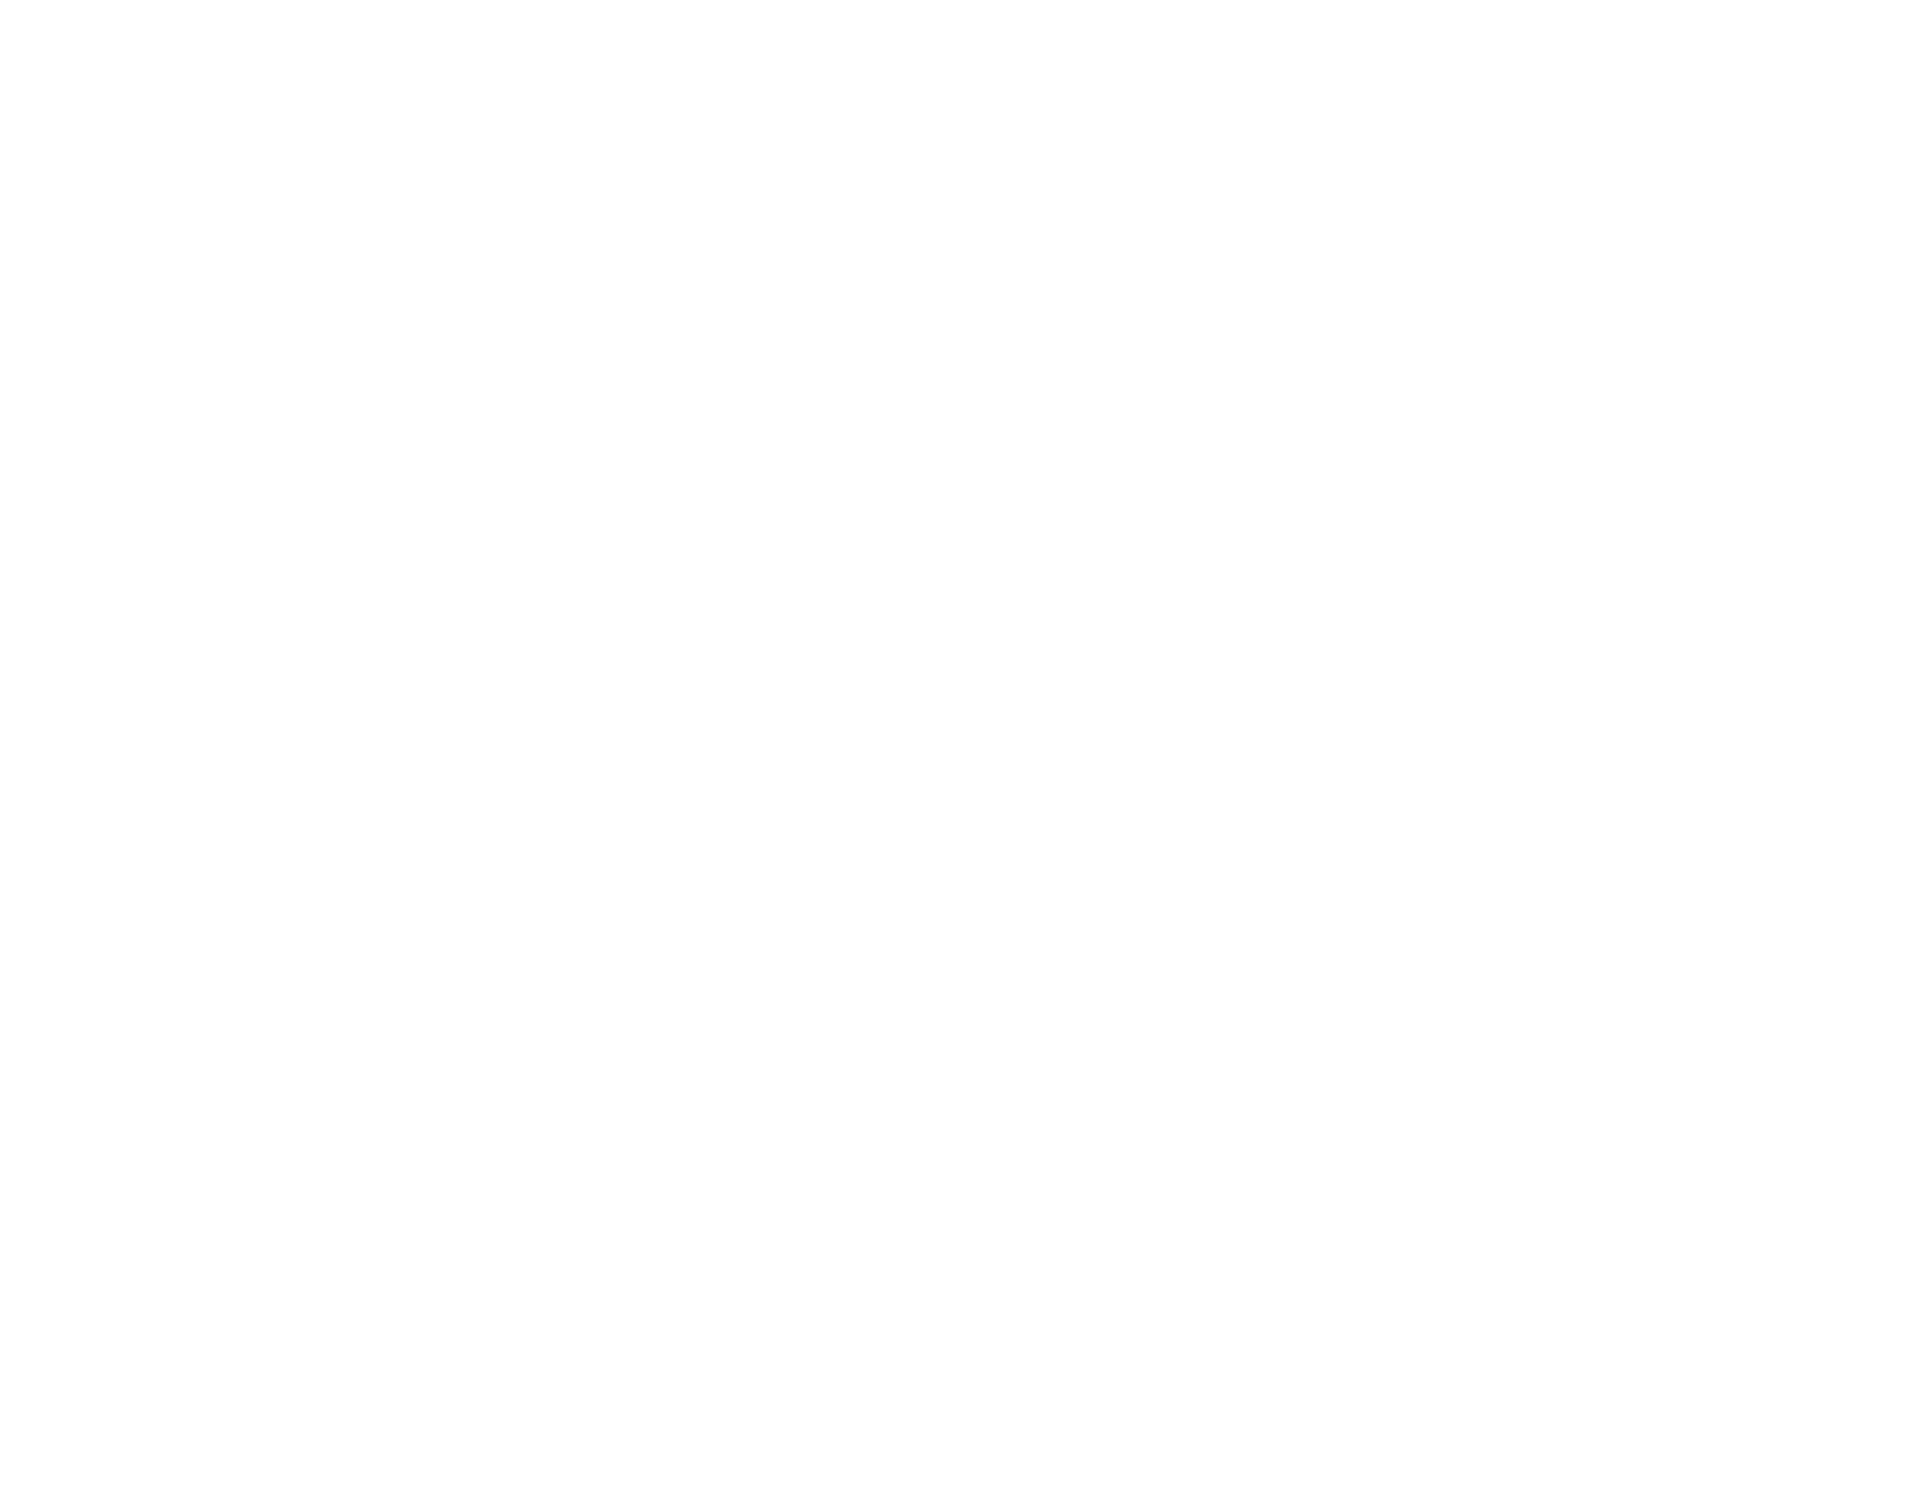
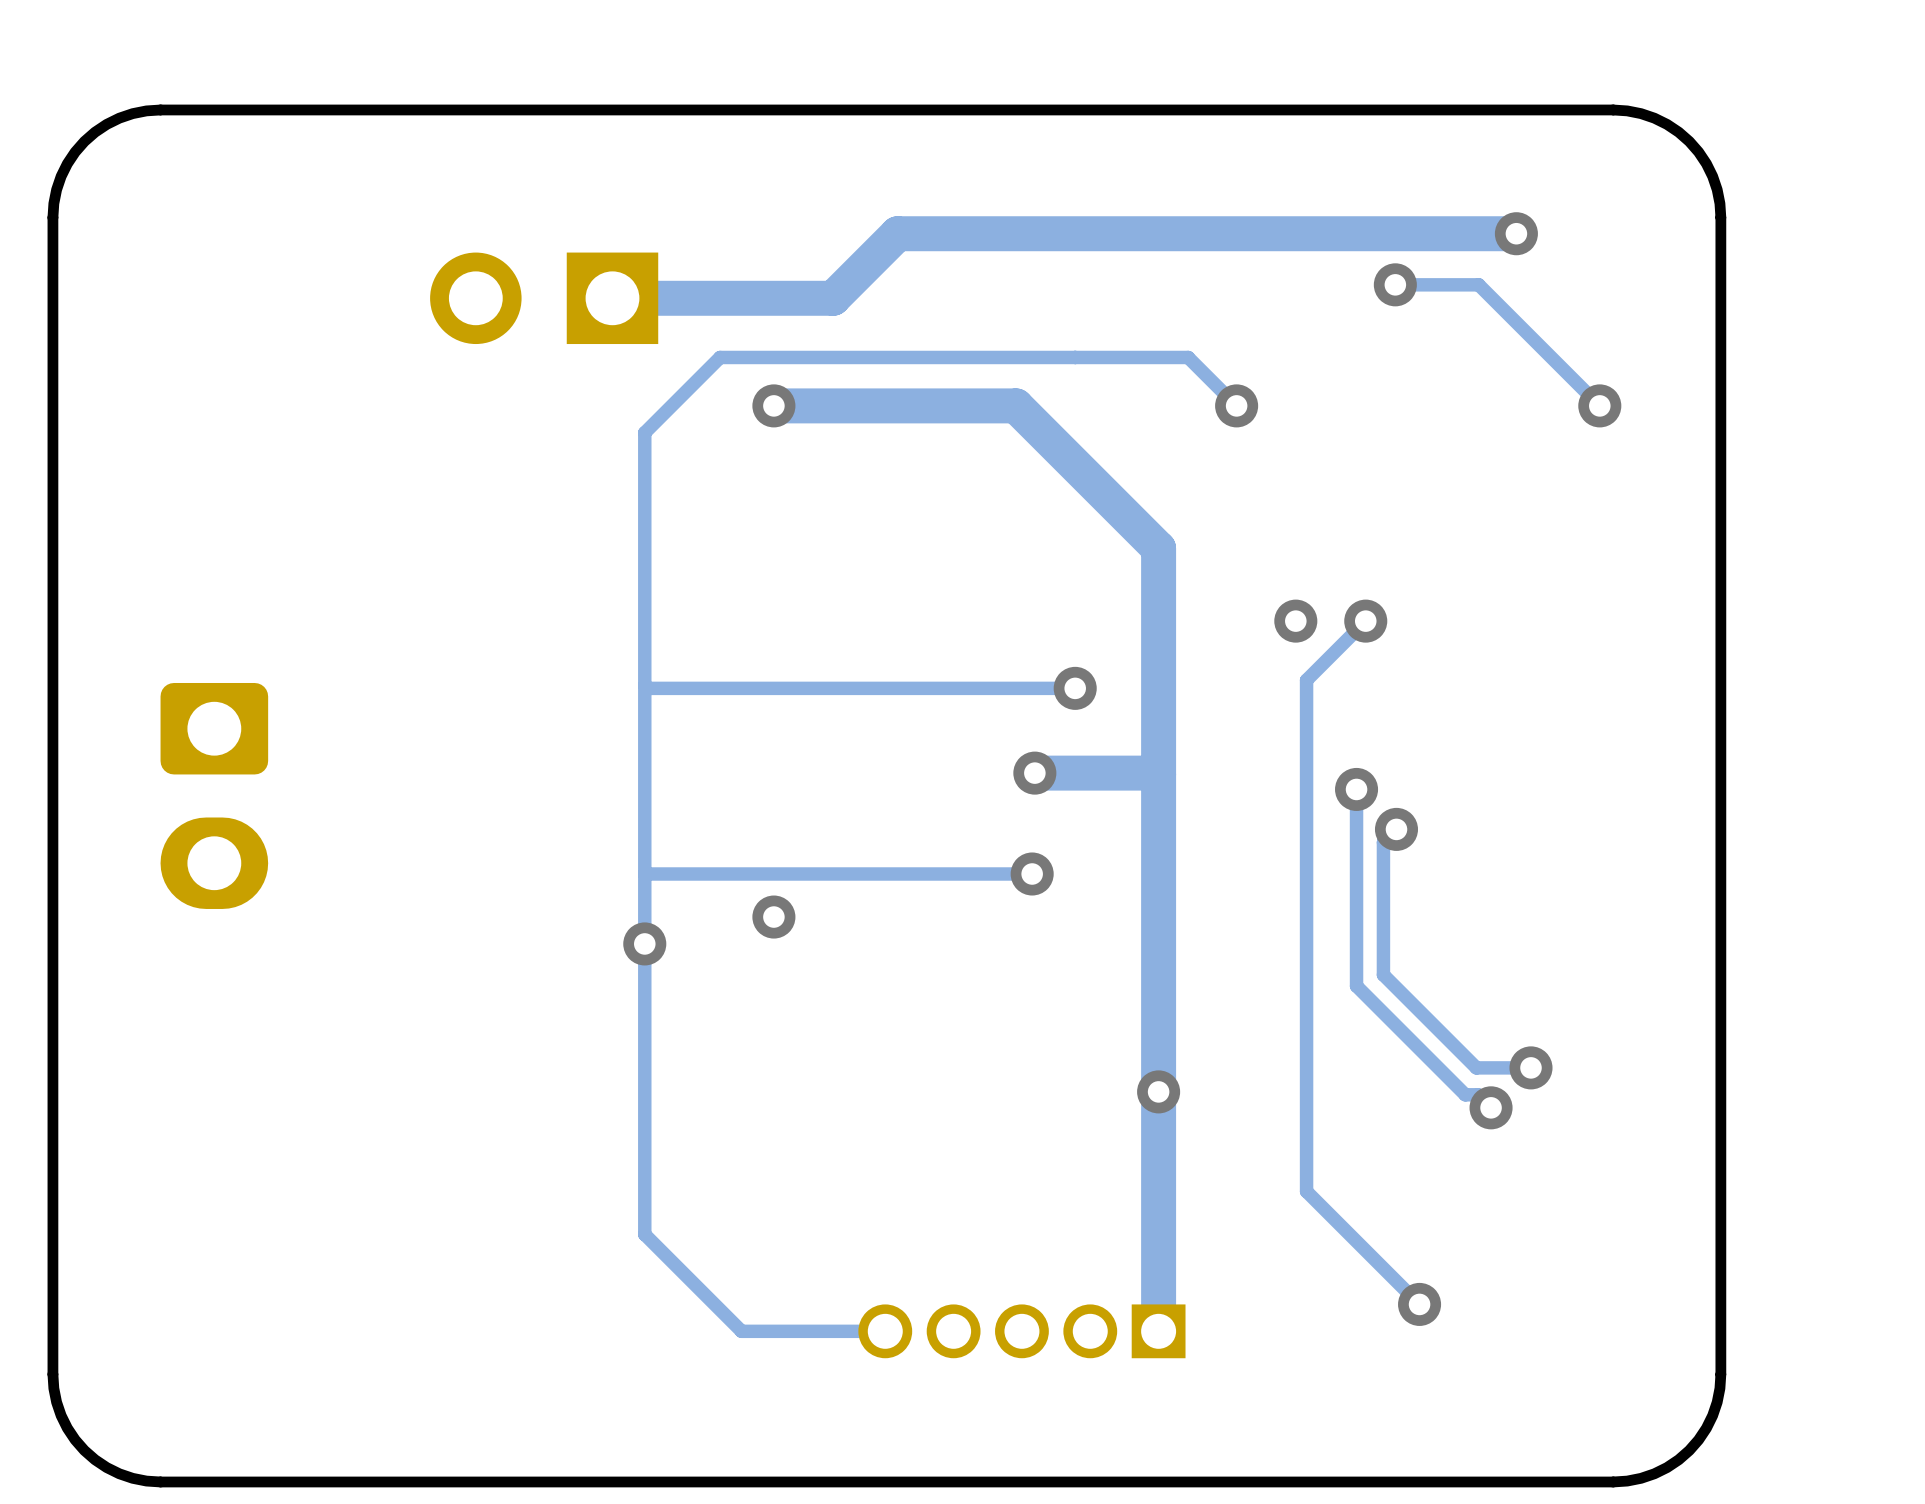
board edge: none -> (1613, 109) (160, 109) (132, 113) (106, 124) (95, 132) (75, 152) (61, 176) (53, 203) (52, 217) (52, 1374) (53, 1388) (61, 1415) (75, 1439) (84, 1450) (106, 1467) (132, 1478) (160, 1481) (1613, 1481) (1641, 1478) (1654, 1473) (1678, 1459) (1698, 1439) (1706, 1428) (1717, 1402) (1720, 1374) (1720, 217) (1717, 189) (1712, 176) (1706, 163) (1689, 141) (1667, 124) (1654, 118) (1641, 113) (1613, 109)
track: none -> (1516, 233) (897, 233) (833, 298) (612, 298)
via: none -> (1516, 233)
track: none -> (1395, 284) (1478, 284) (1599, 405)
via: none -> (1395, 284)
part: none -> (544, 298)
track: none -> (773, 405) (1016, 405) (1158, 548) (1158, 1331)
via: none -> (773, 405)
track: none -> (1236, 405) (1188, 357) (720, 357) (644, 432) (644, 1234) (741, 1331) (885, 1331)
via: none -> (1236, 405)
via: none -> (1599, 405)
via: none -> (1295, 621)
track: none -> (1365, 621) (1306, 680) (1306, 1191) (1419, 1304)
via: none -> (1365, 621)
track: none -> (644, 685) (647, 688) (1075, 688)
via: none -> (1075, 688)
track: none -> (1034, 773) (1158, 774)
via: none -> (1034, 773)
track: none -> (1356, 789) (1356, 986) (1465, 1094) (1478, 1094) (1491, 1107)
via: none -> (1356, 789)
part: none -> (214, 795)
track: none -> (1396, 829) (1383, 842) (1383, 974) (1476, 1067) (1530, 1067)
via: none -> (1396, 829)
track: none -> (1032, 873) (644, 873)
via: none -> (1032, 873)
via: none -> (773, 917)
via: none -> (644, 943)
via: none -> (1530, 1067)
via: none -> (1158, 1091)
via: none -> (1491, 1107)
via: none -> (1419, 1304)
part: none -> (1021, 1331)

